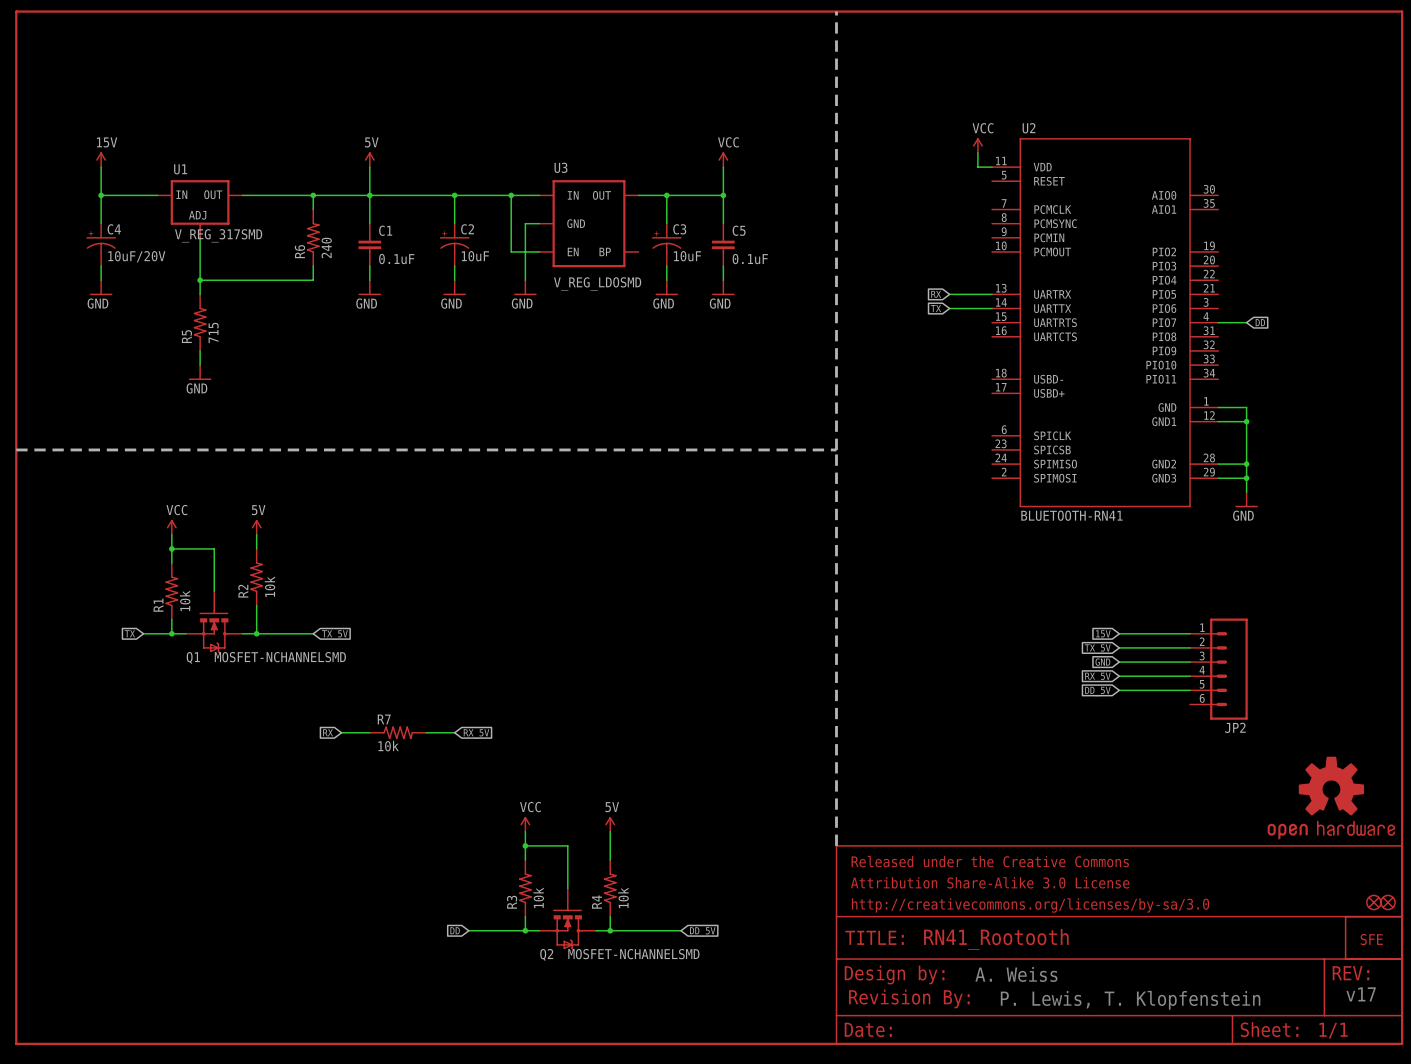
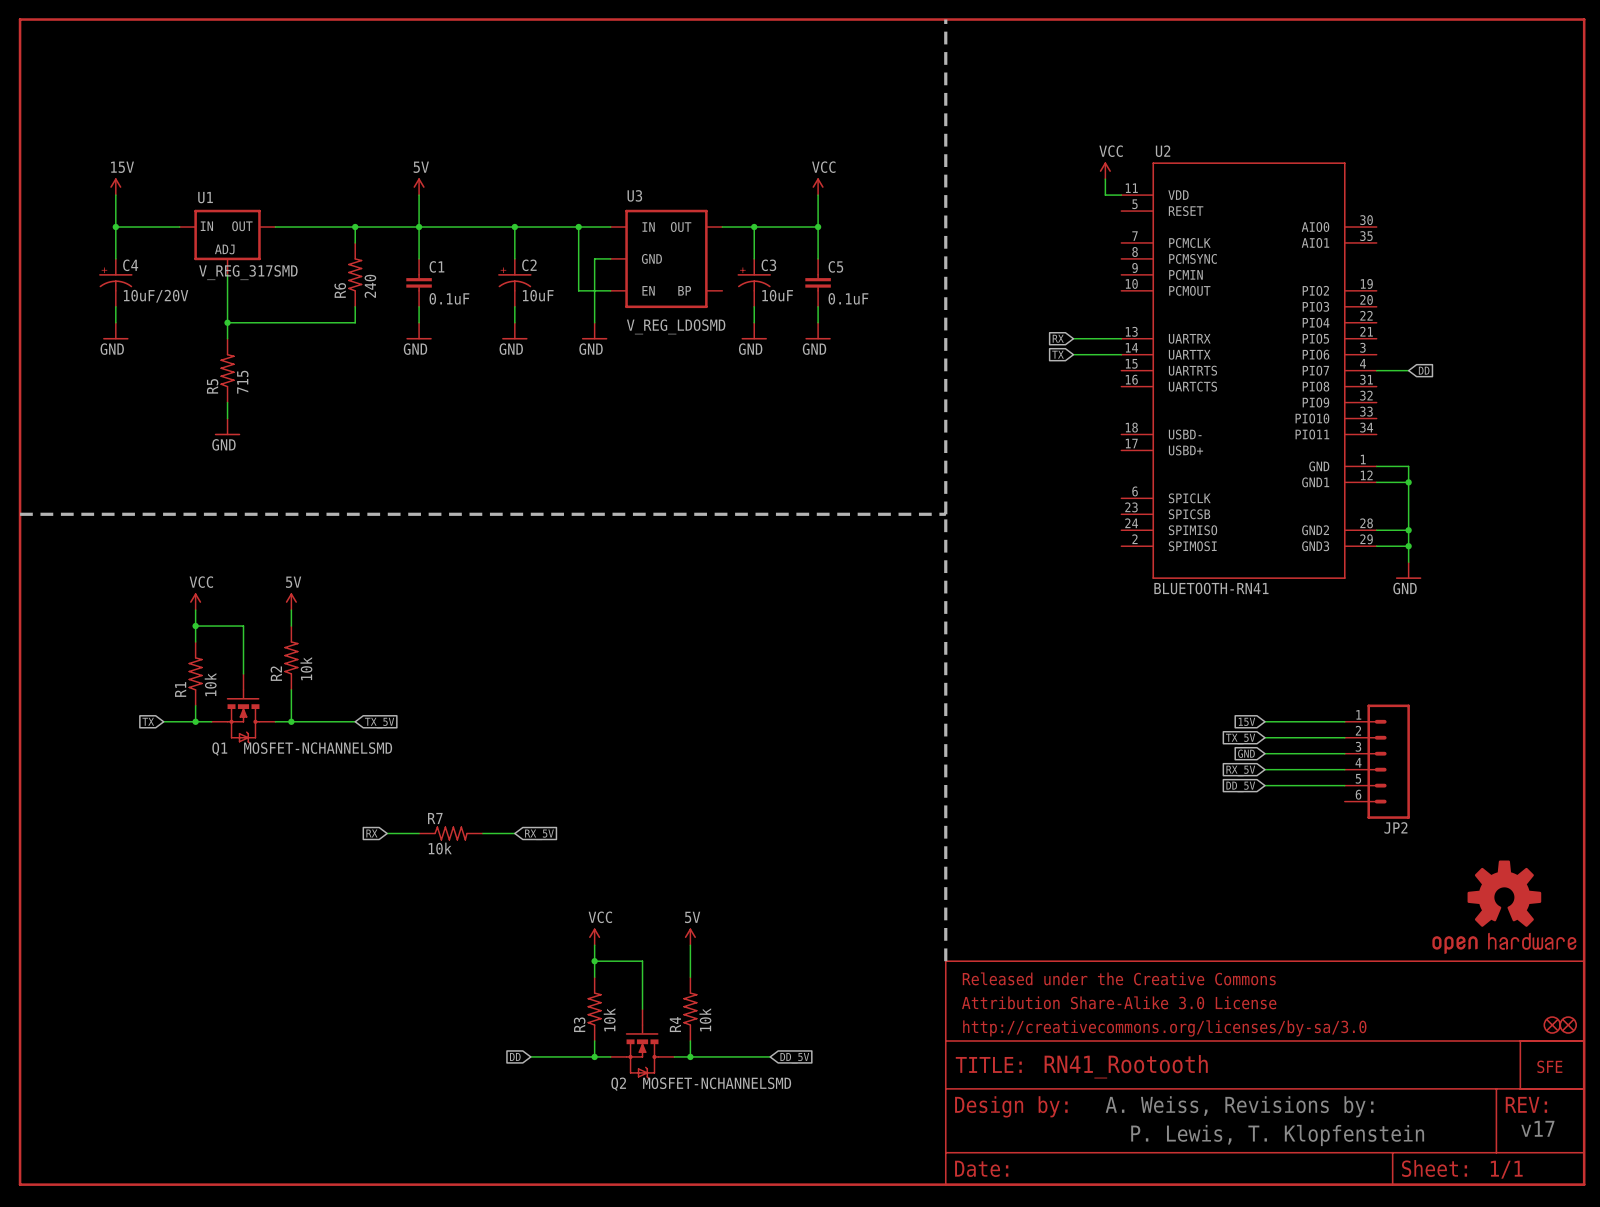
text: A. Weiss (1016, 974) -> A. Weiss, Revisions by: (1239, 1106)
part: (909, 998) -> none

